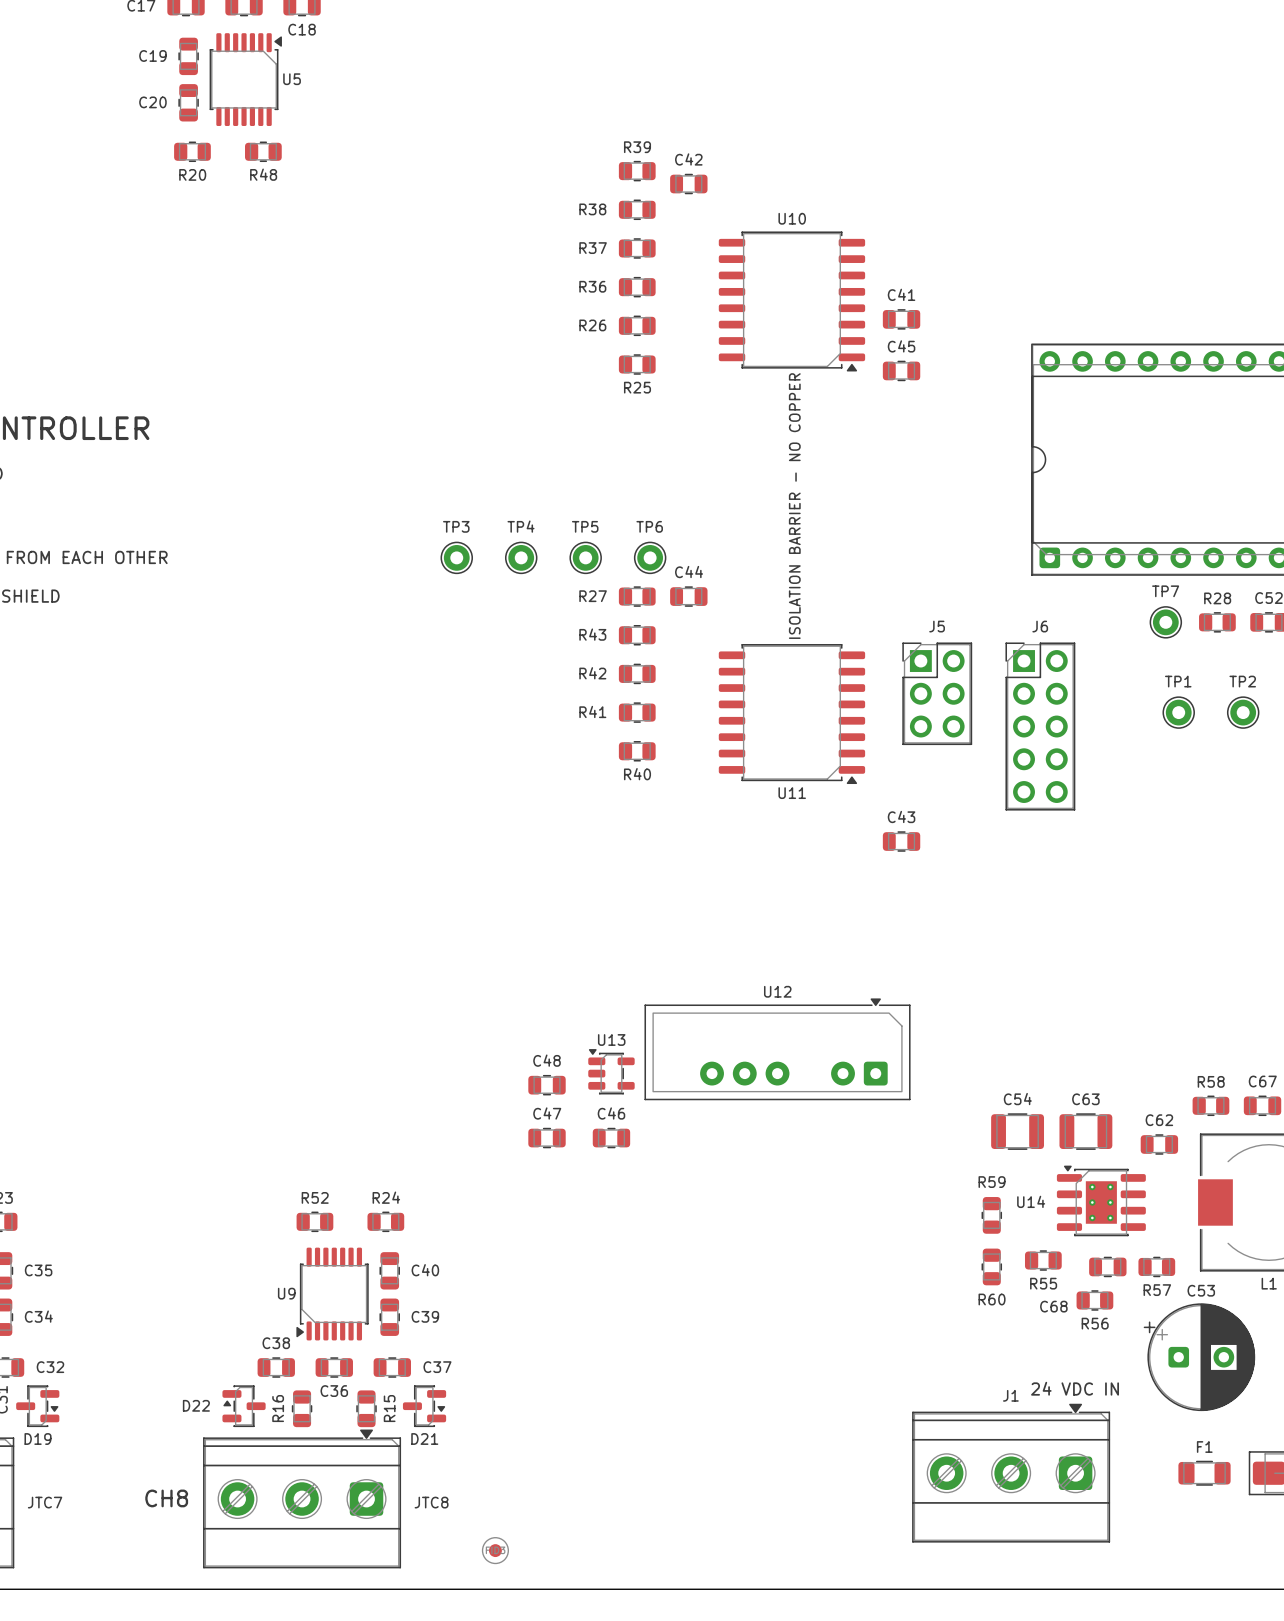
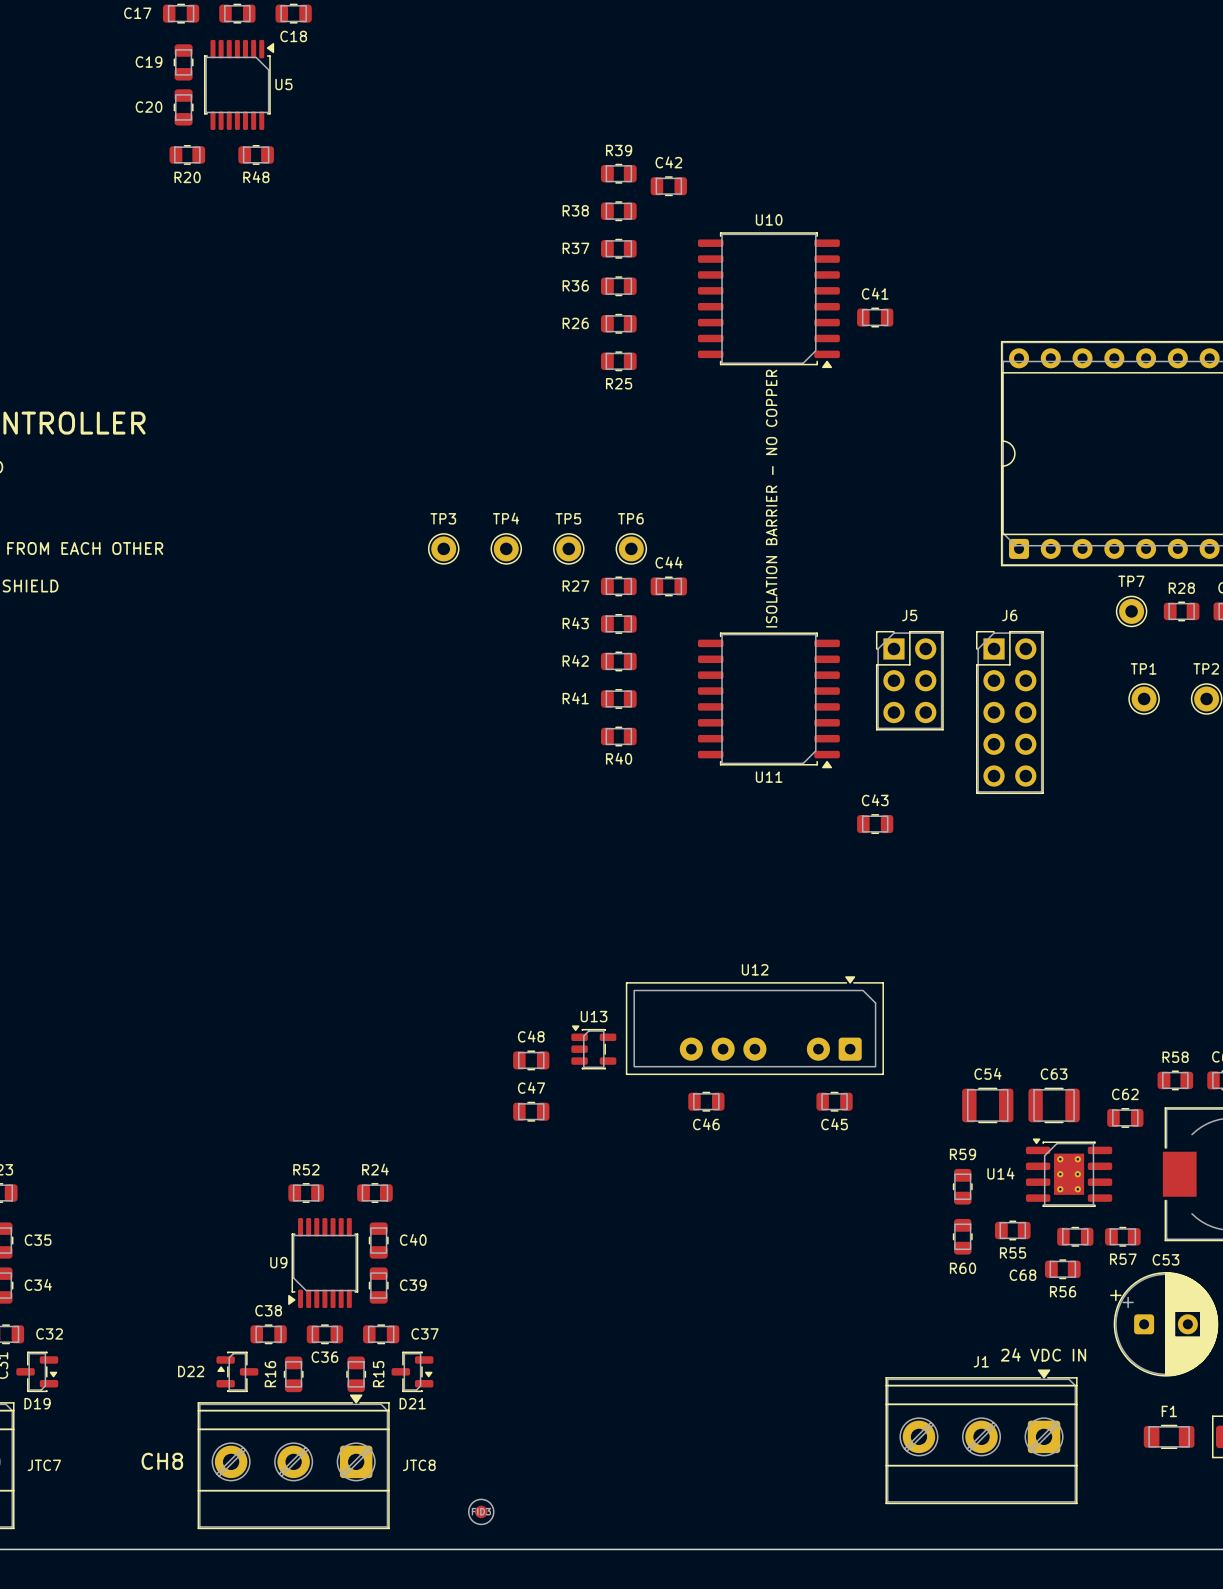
C45 name position: C45 (901, 346) -> C45 (834, 1124)
C45 position: (901, 370) -> (834, 1101)
C46 name position: C46 (611, 1113) -> C46 (706, 1124)
C46 position: (611, 1138) -> (706, 1101)

